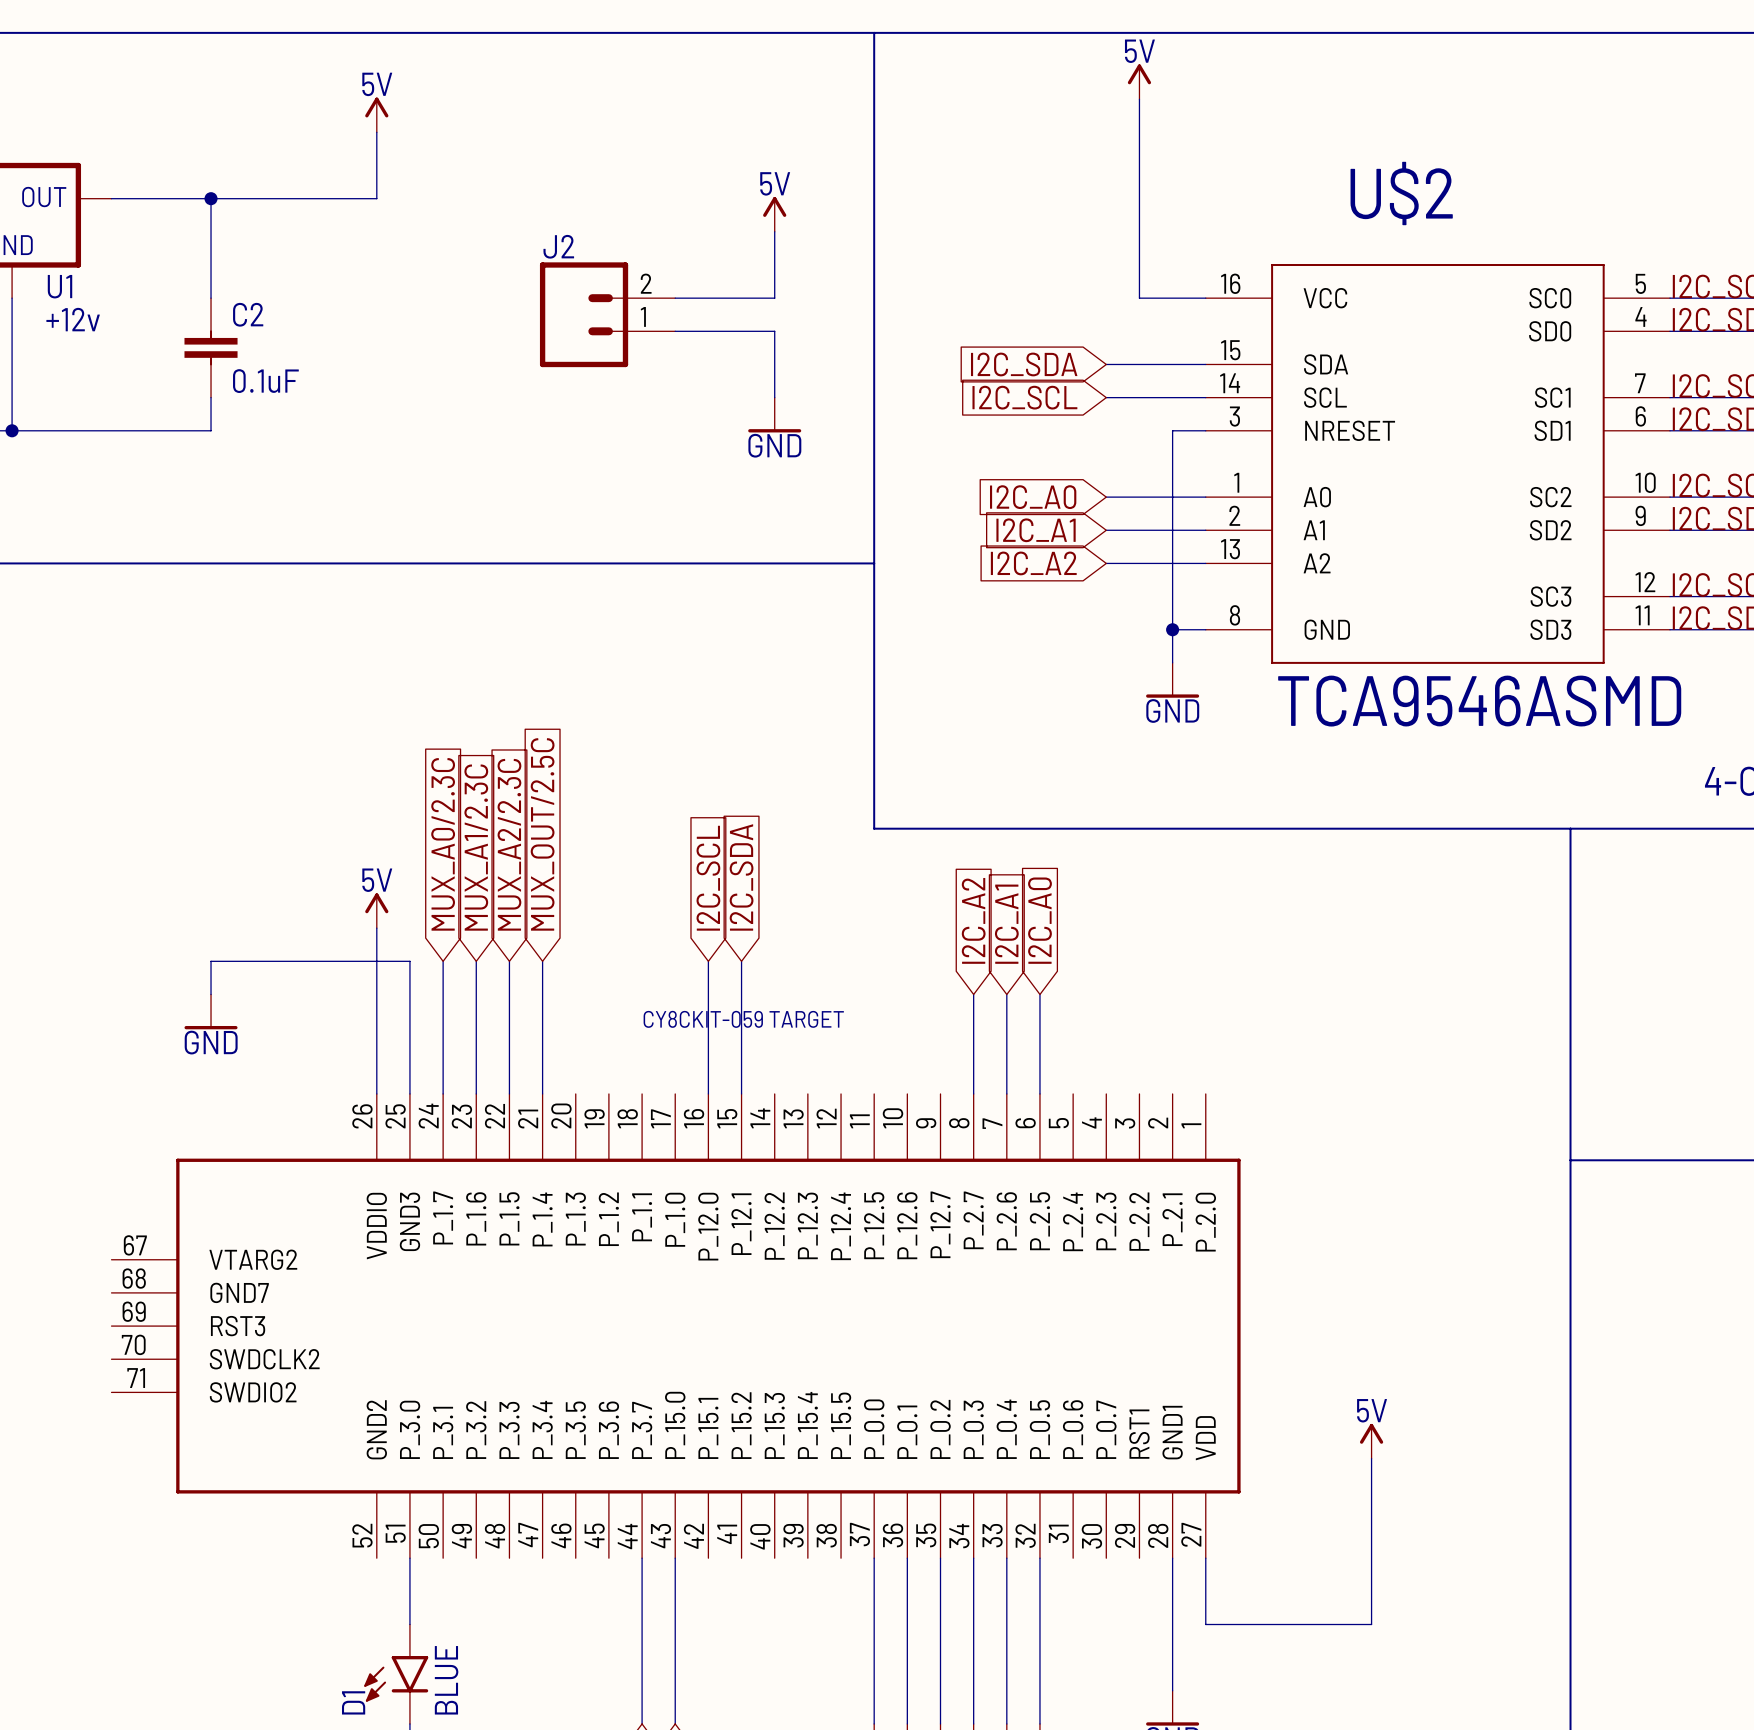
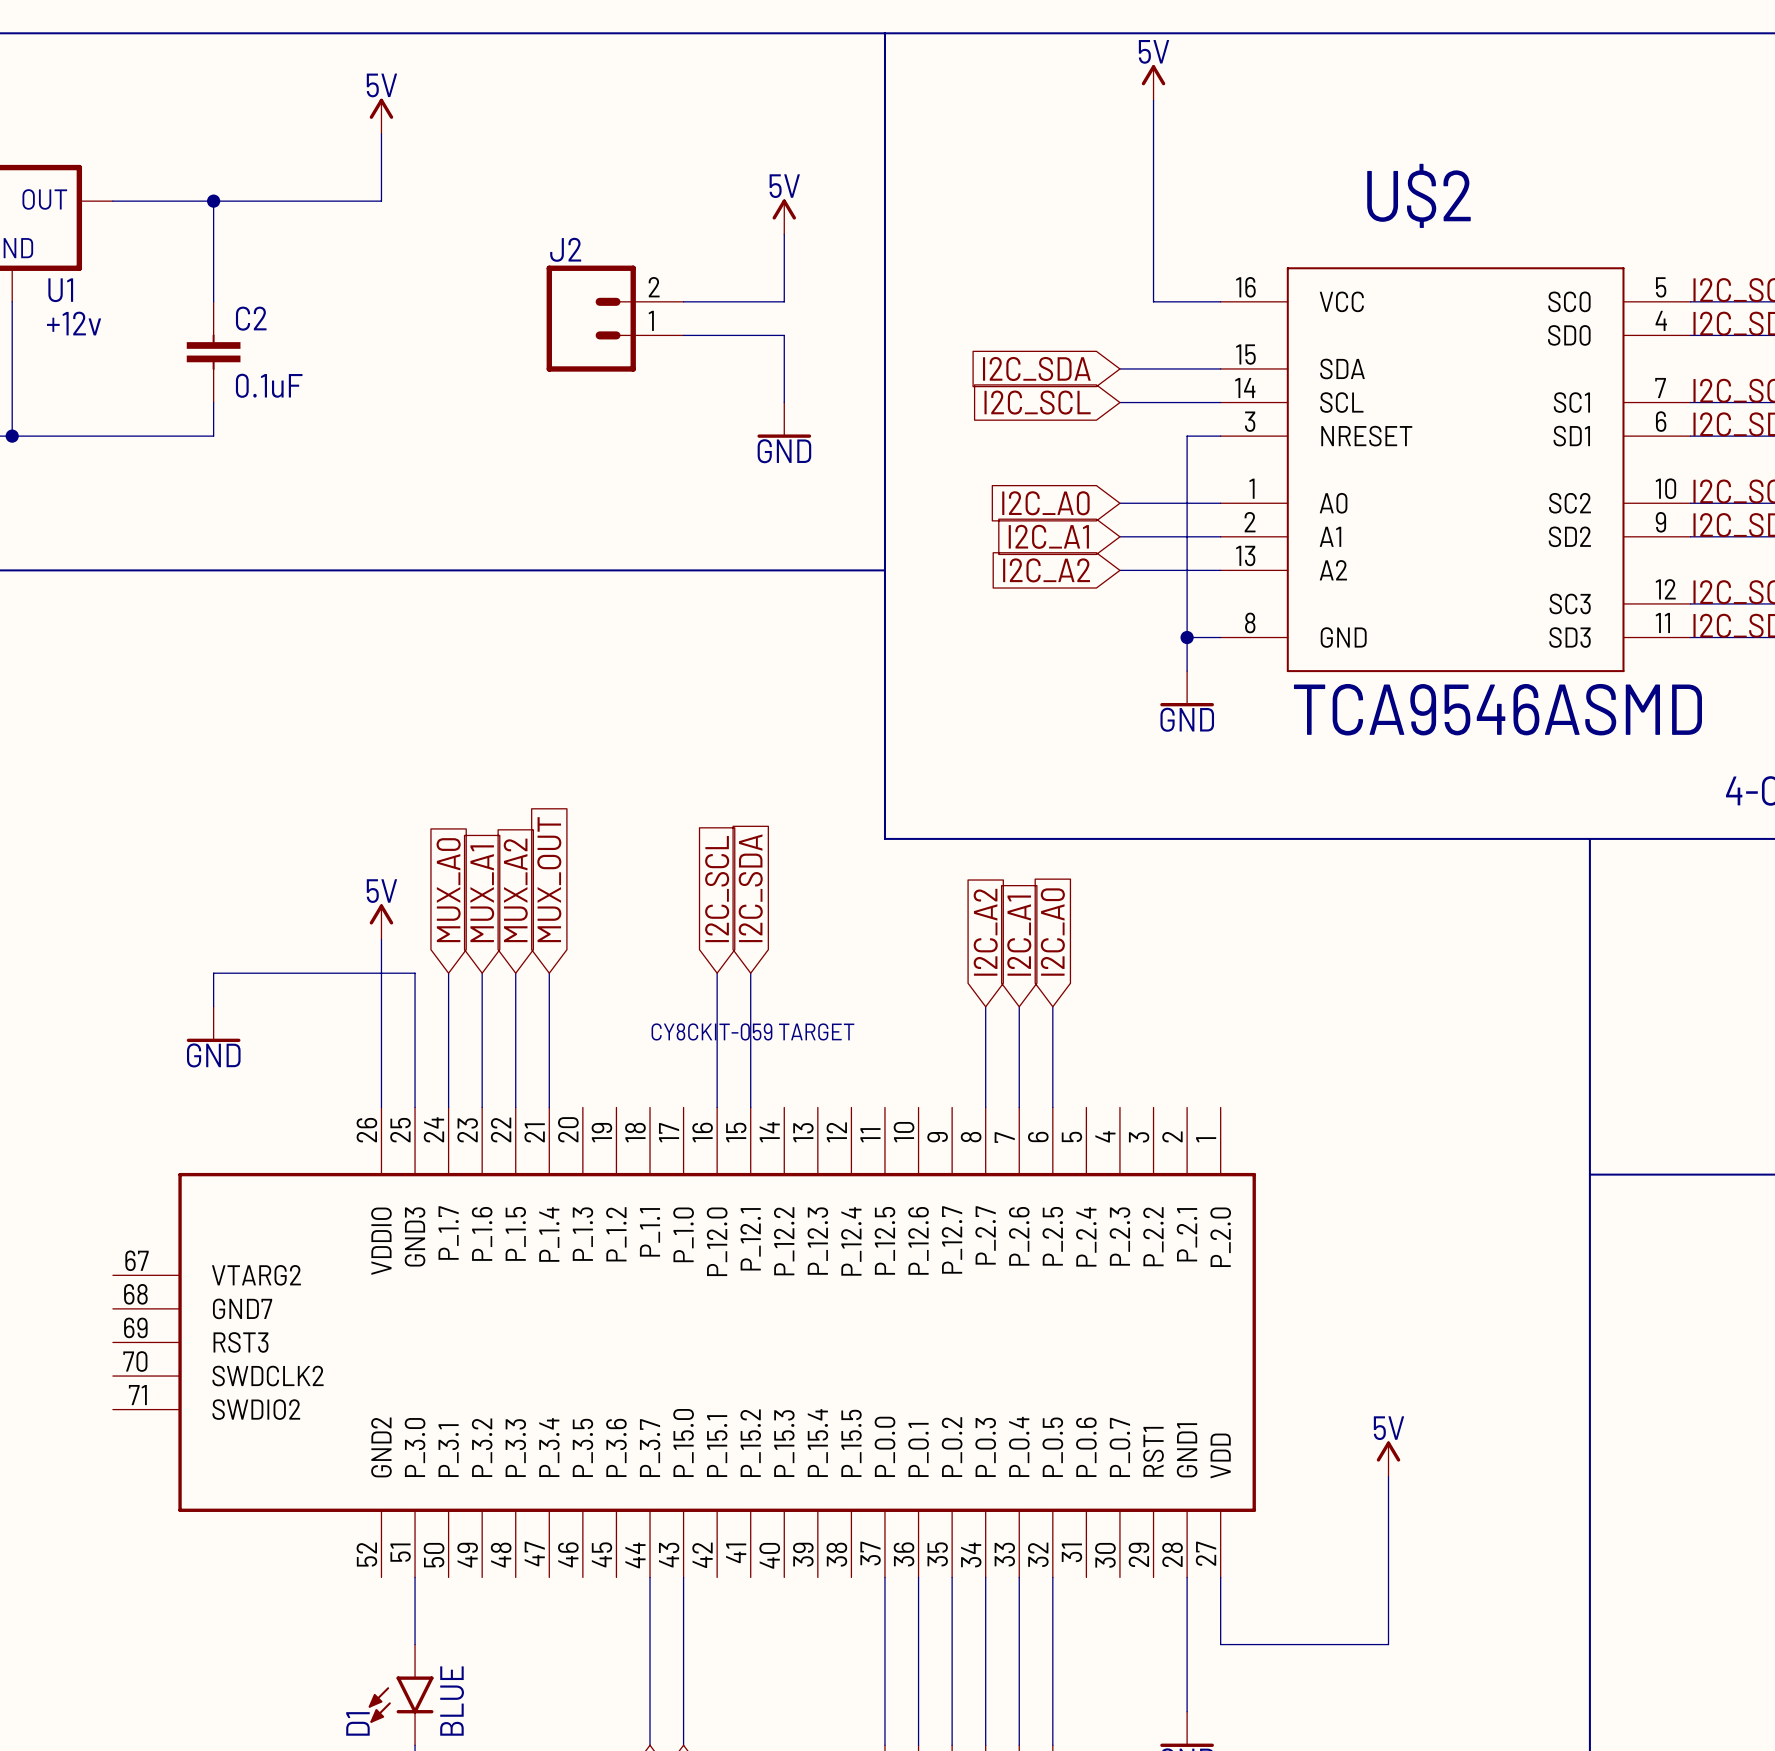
global label: MUX_OUT/2.5C (542, 834) -> MUX_OUT (549, 879)
global label: MUX_A0/2.3C (443, 844) -> MUX_A0 (448, 890)
global label: MUX_A2/2.3C (509, 844) -> MUX_A2 (515, 890)
global label: MUX_A1/2.3C (476, 847) -> MUX_A1 (482, 893)

